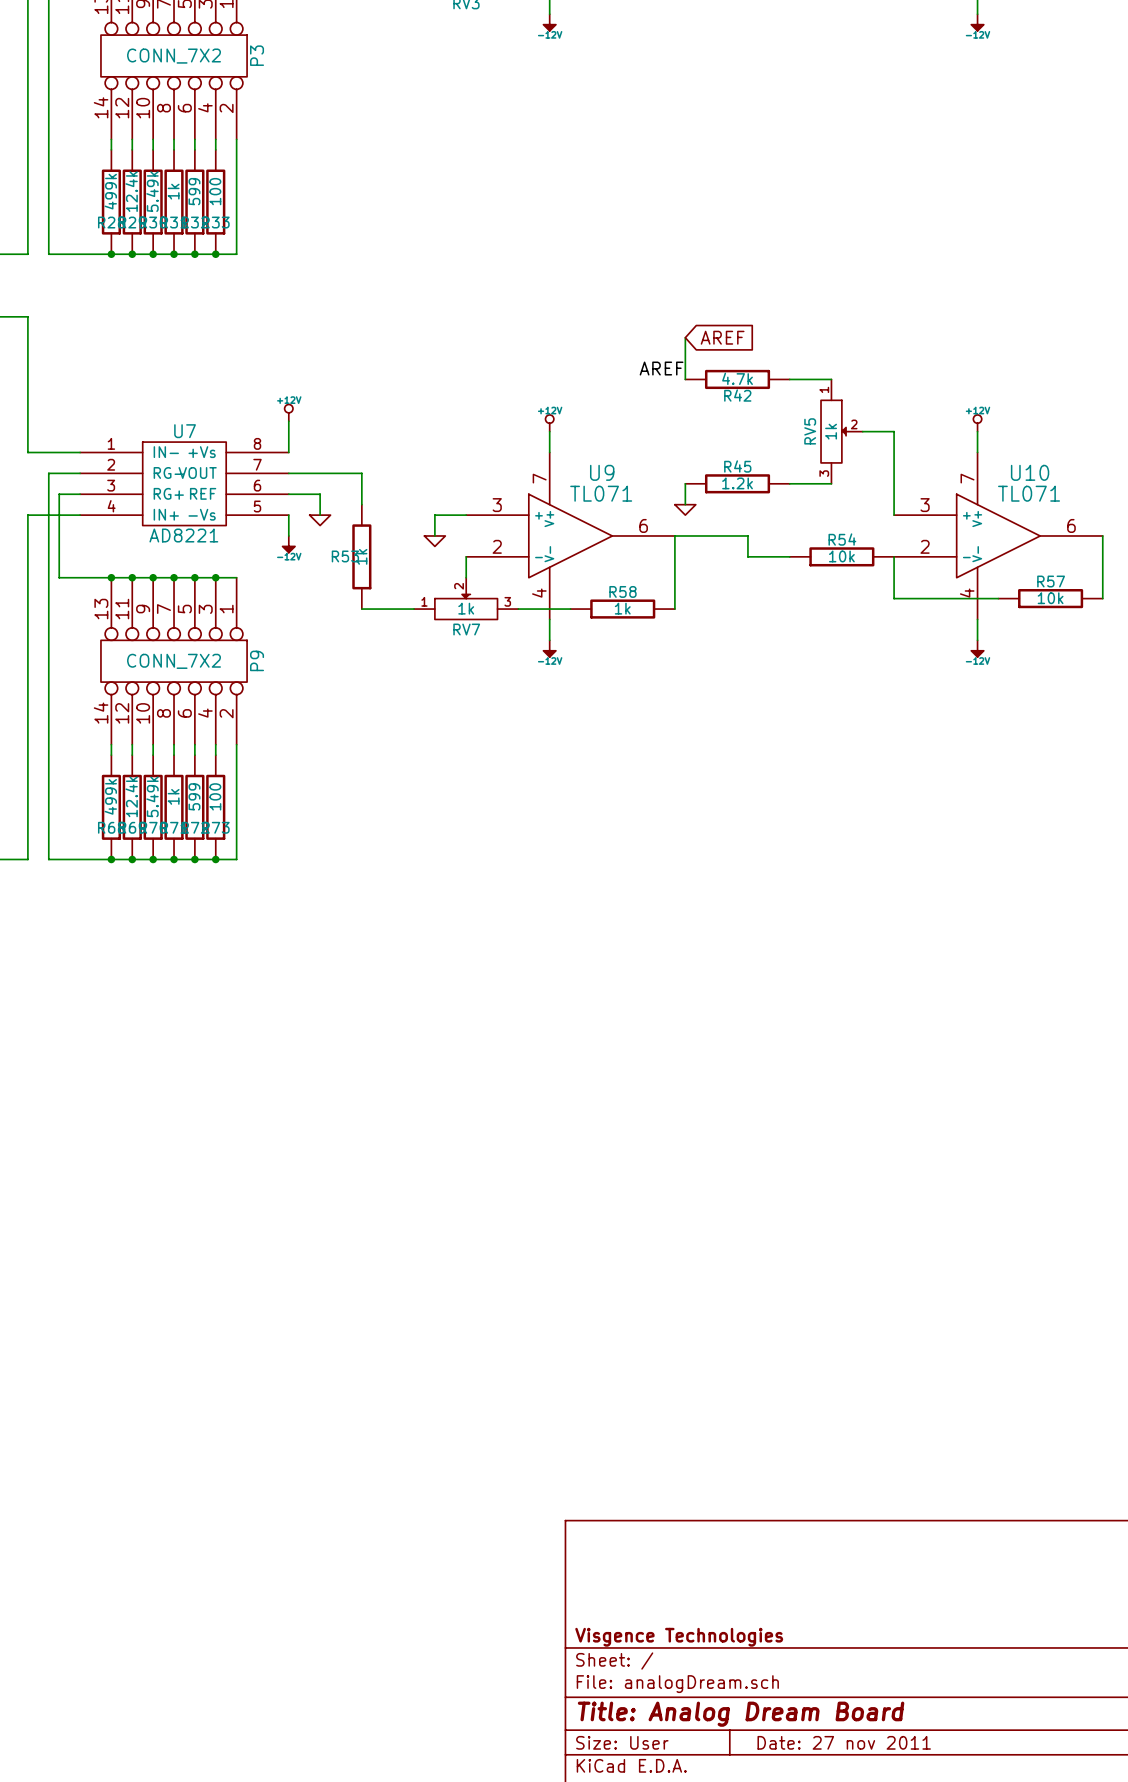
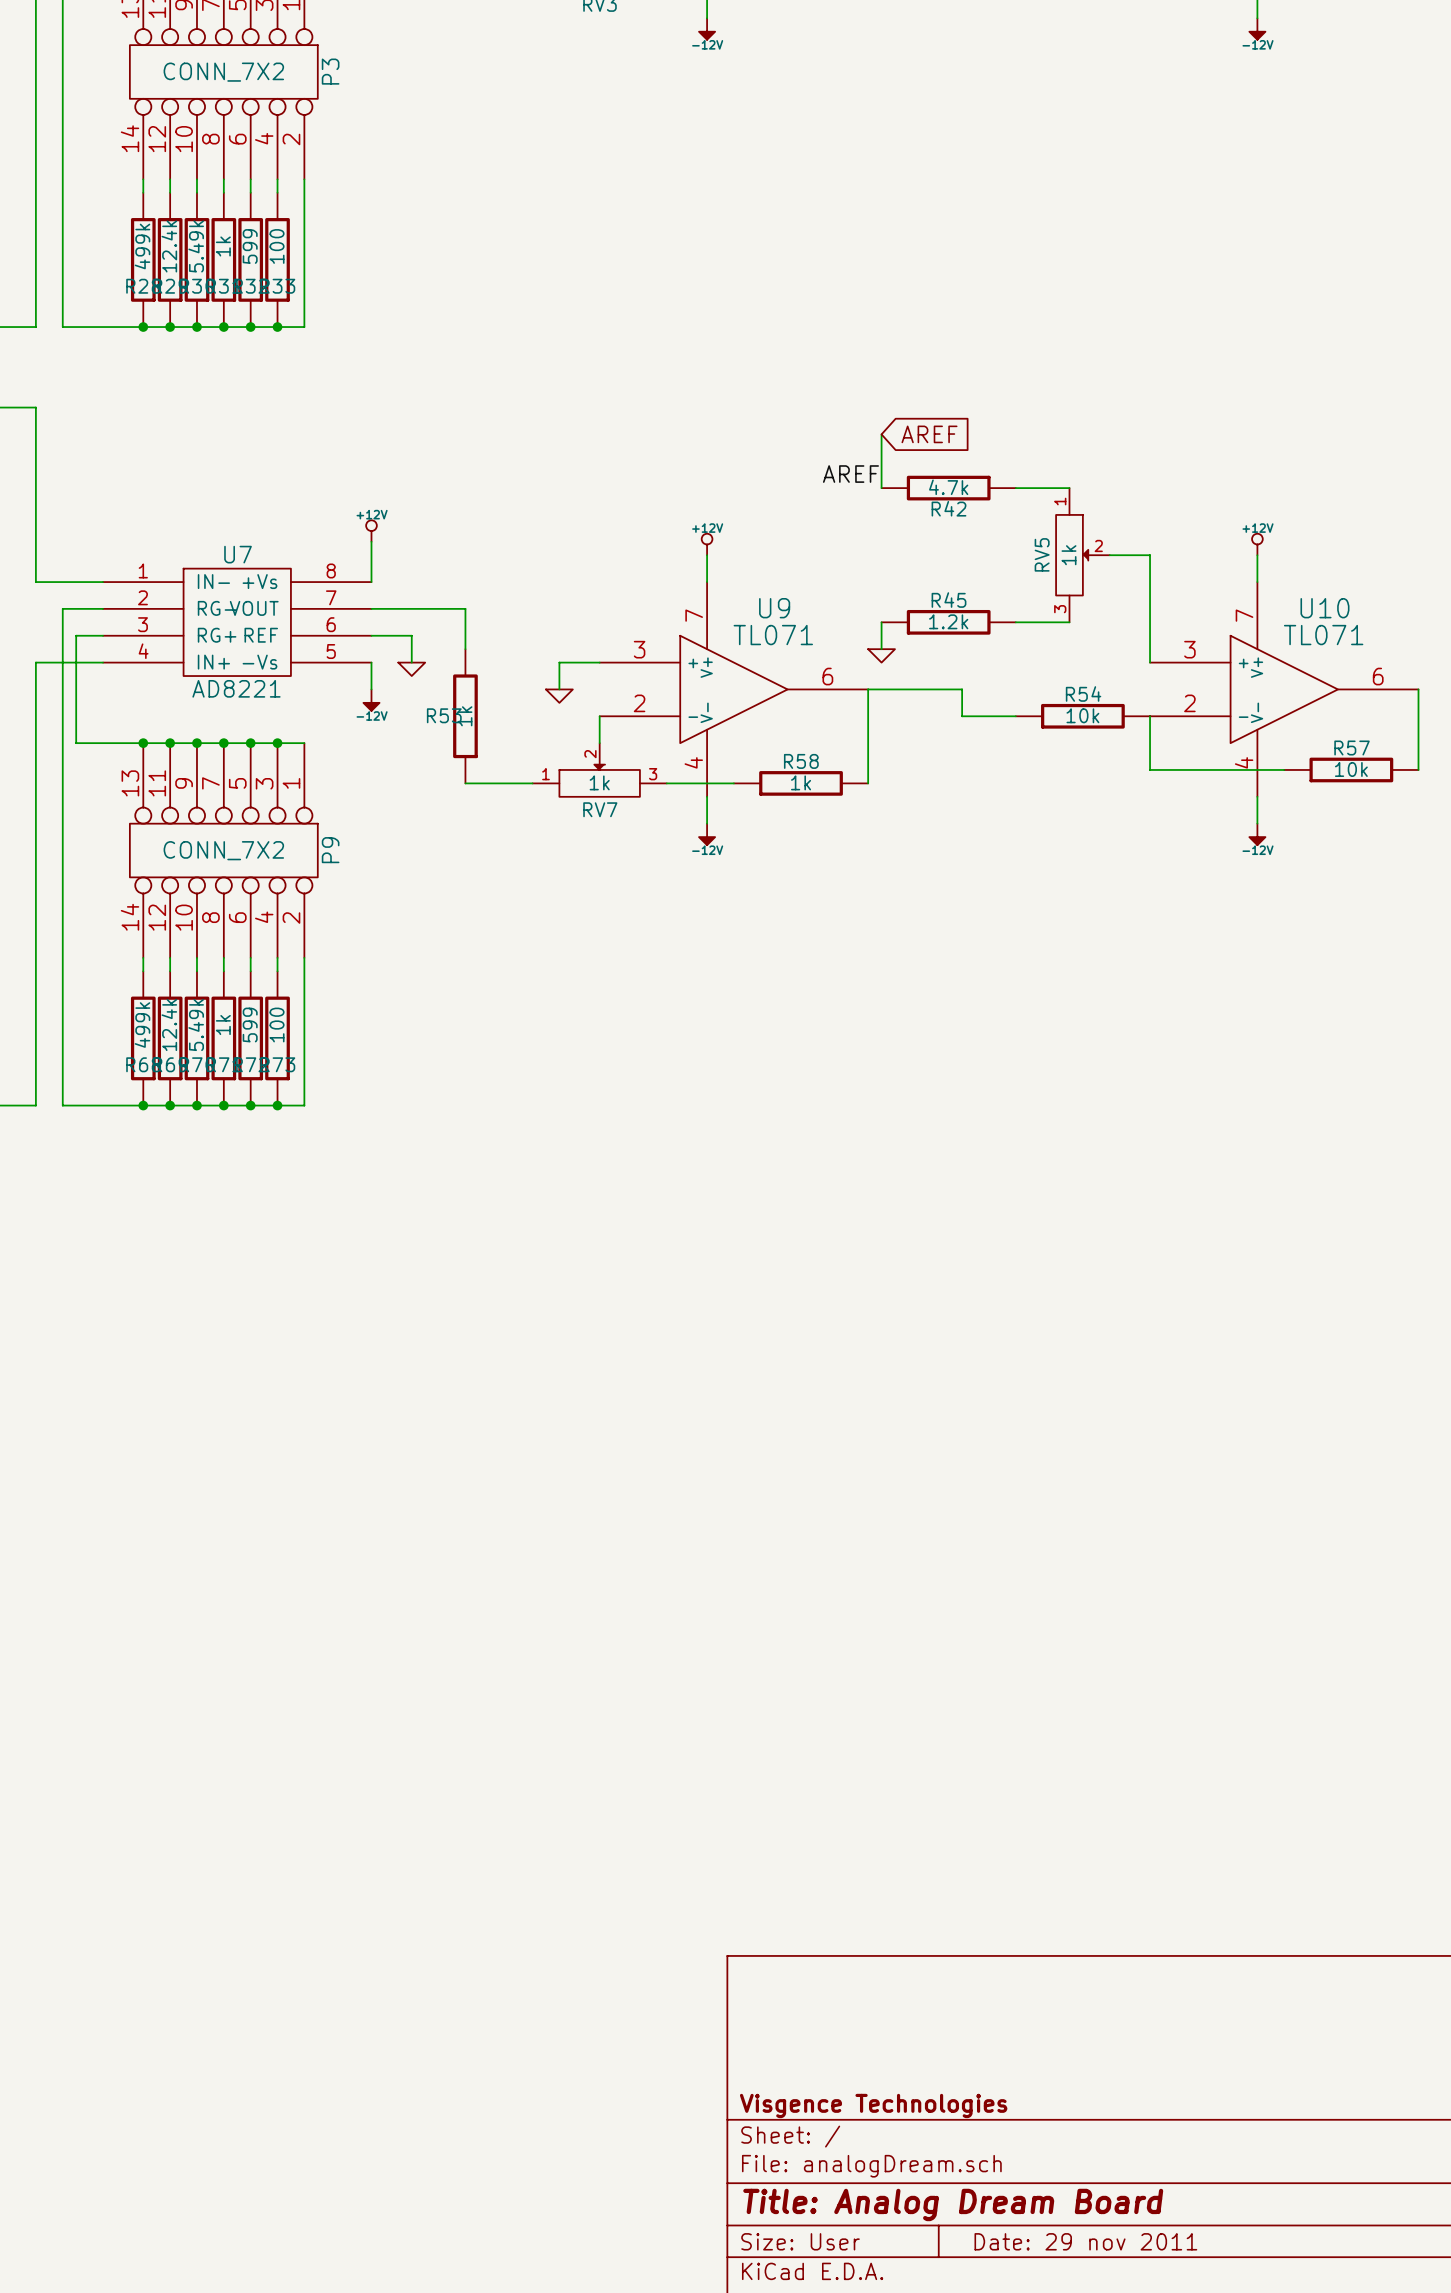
title block: Date: 27 nov 2011 (844, 1742) -> Date: 29 nov 2011 (1085, 2241)

